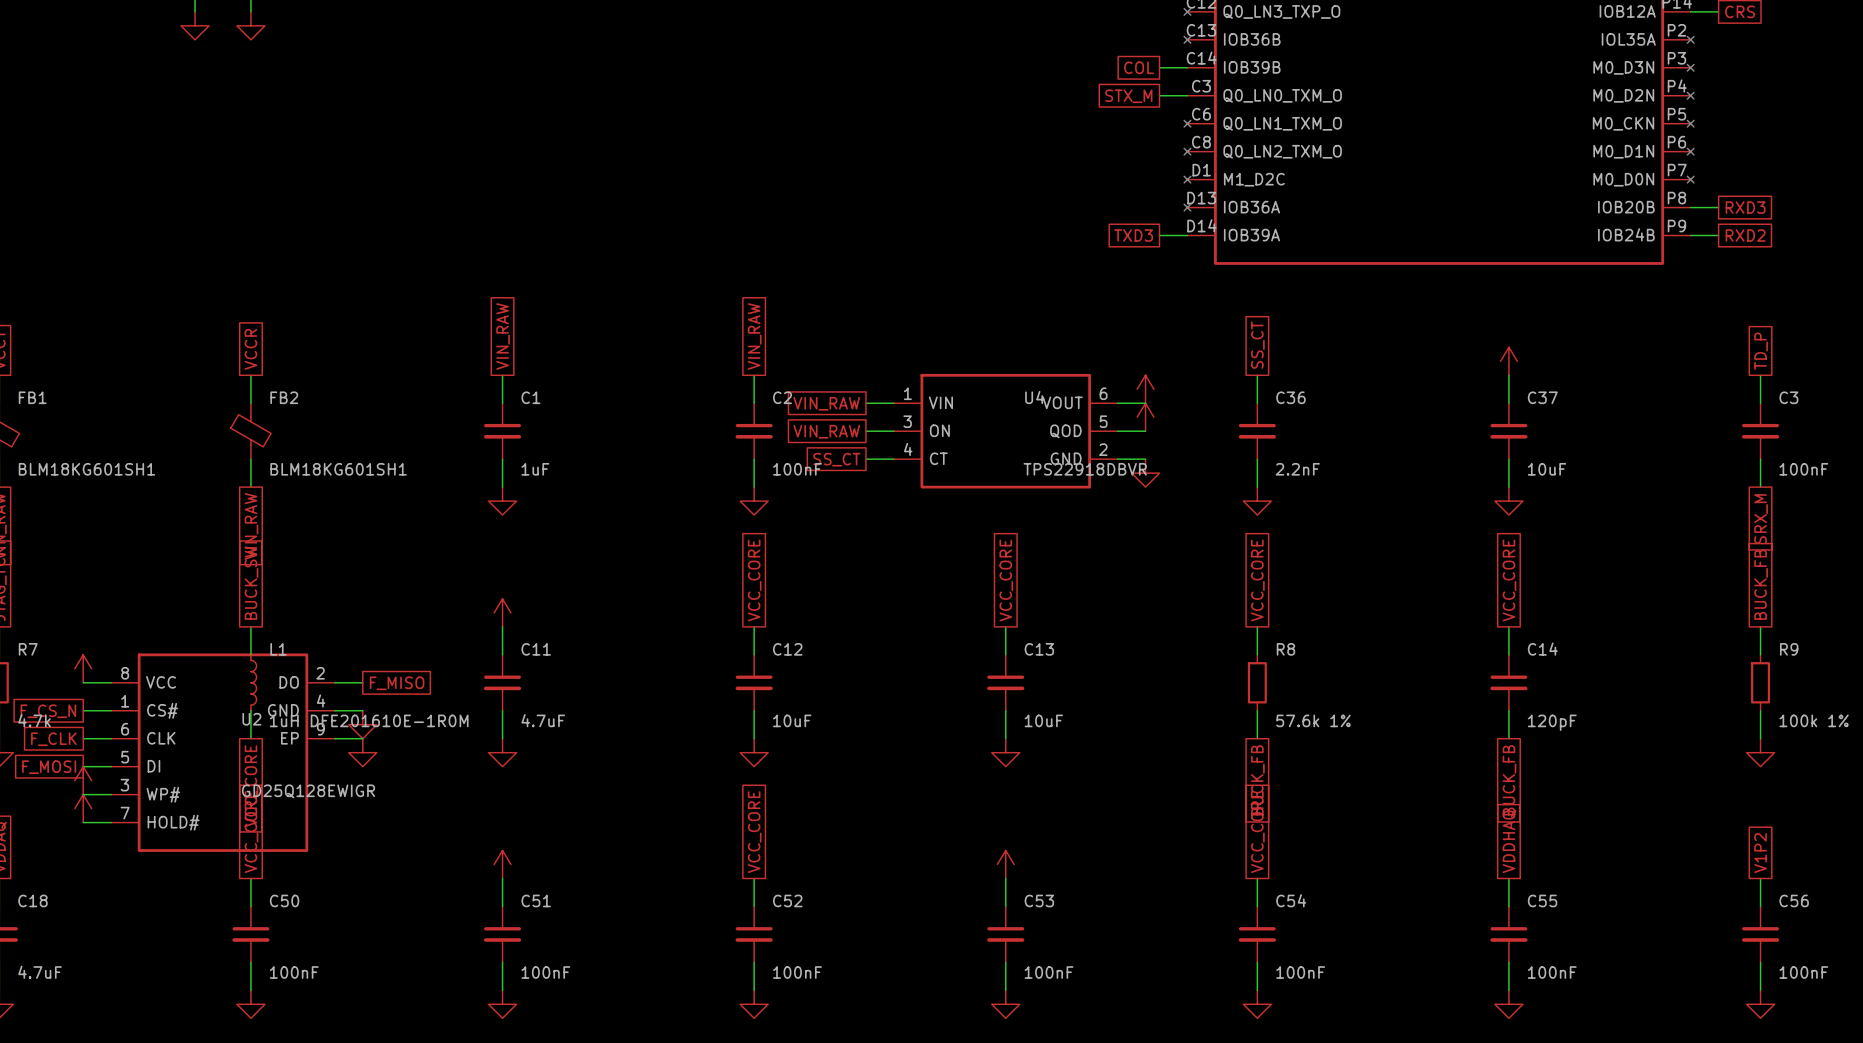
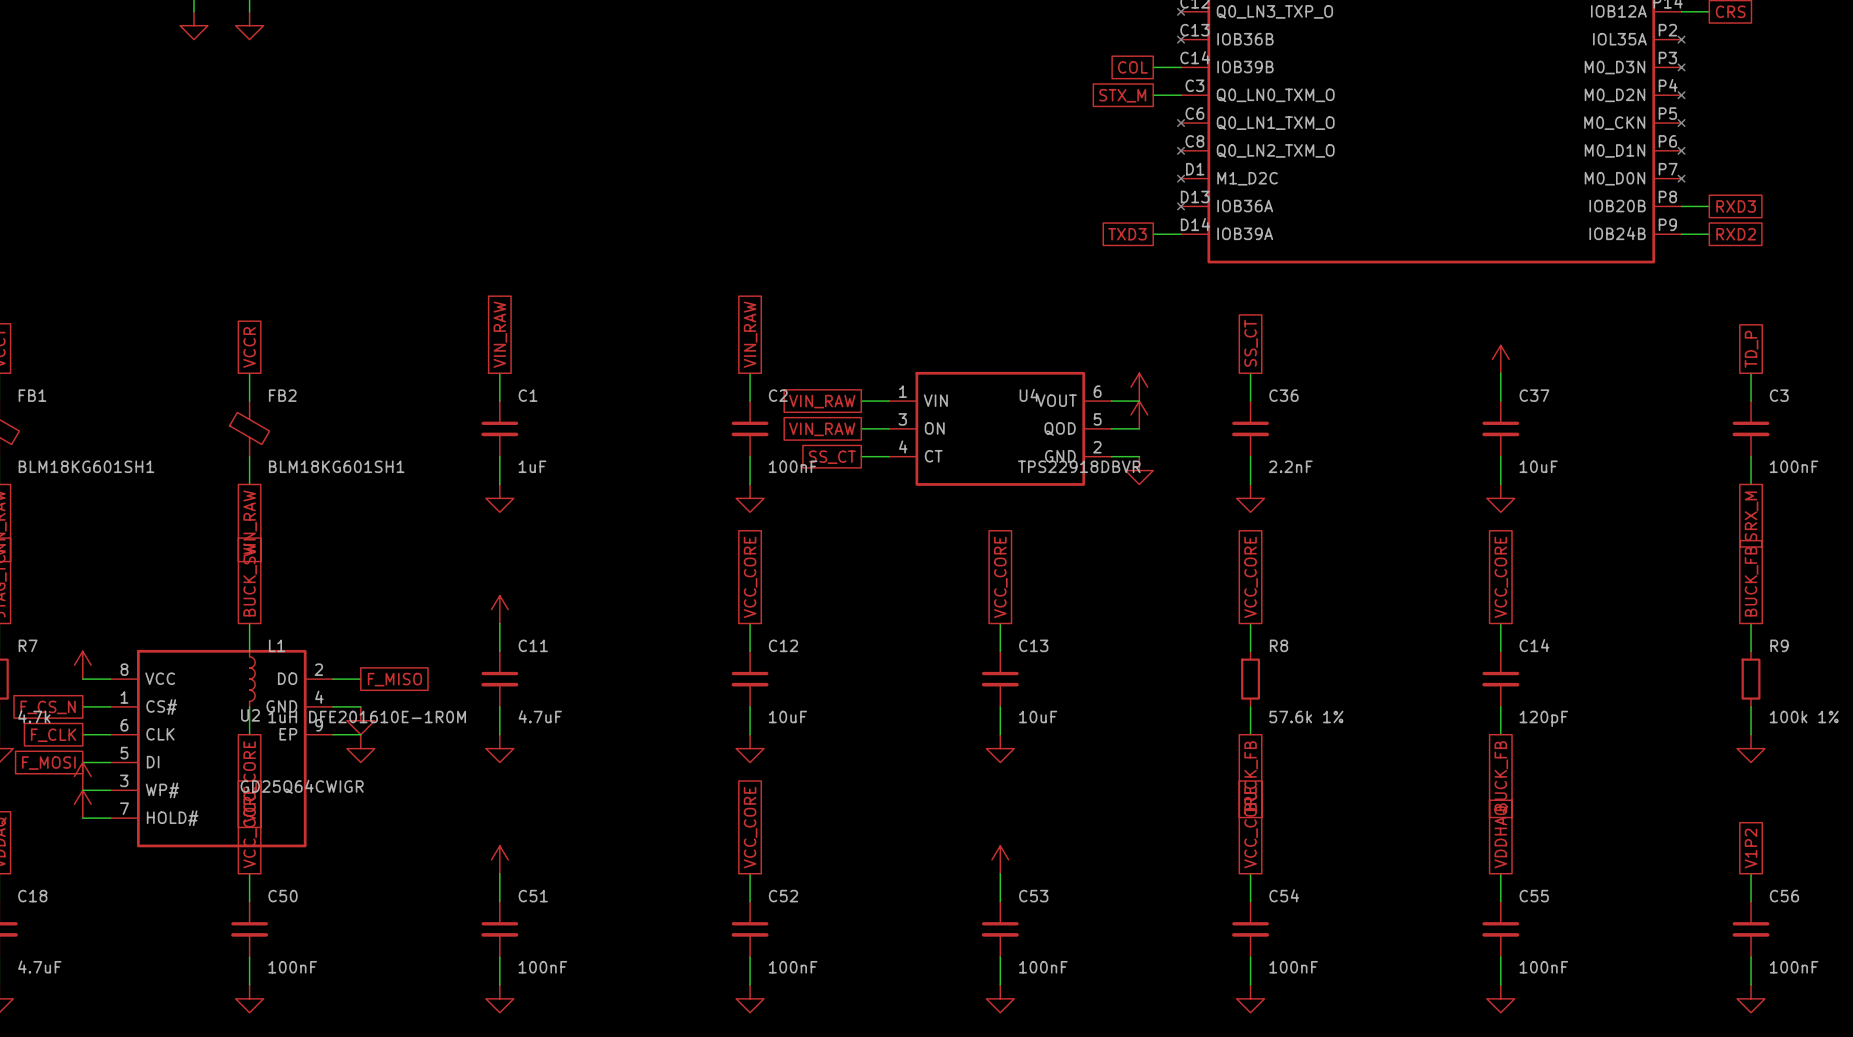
U2 value: GD25Q128EWIGR (308, 791) -> GD25Q64CWIGR (302, 786)

